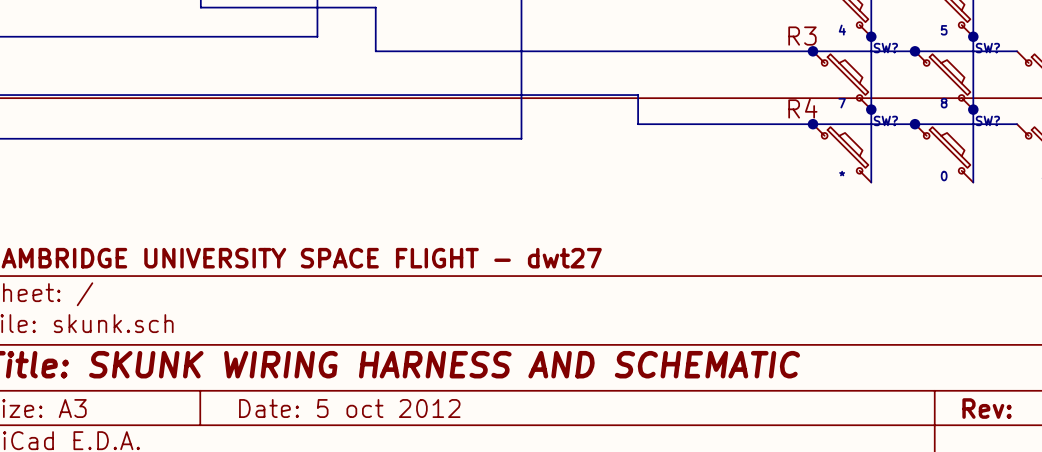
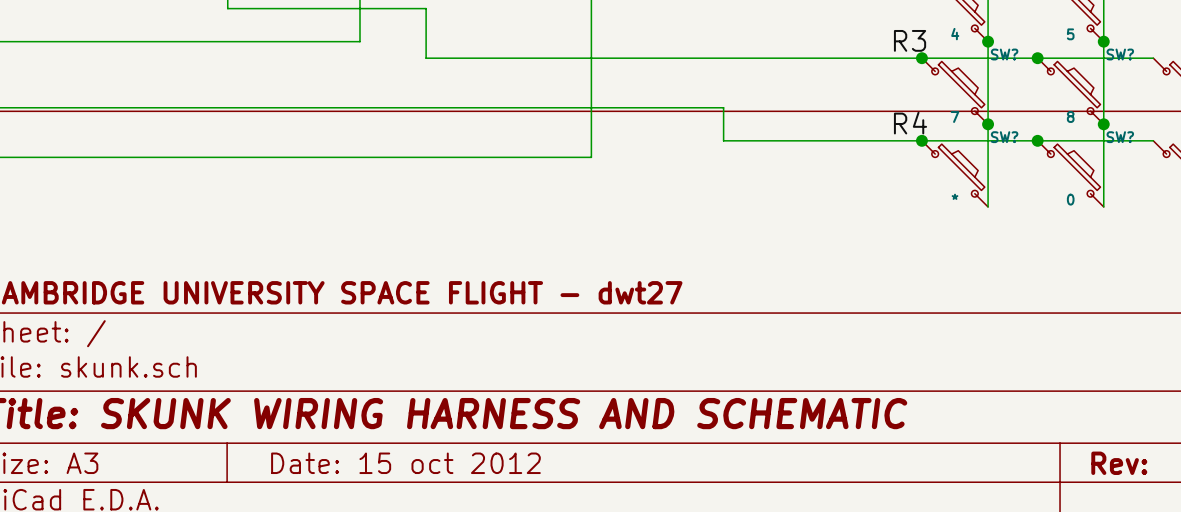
title block: Date: 5 oct 2012 (349, 408) -> Date: 15 oct 2012 (405, 463)

